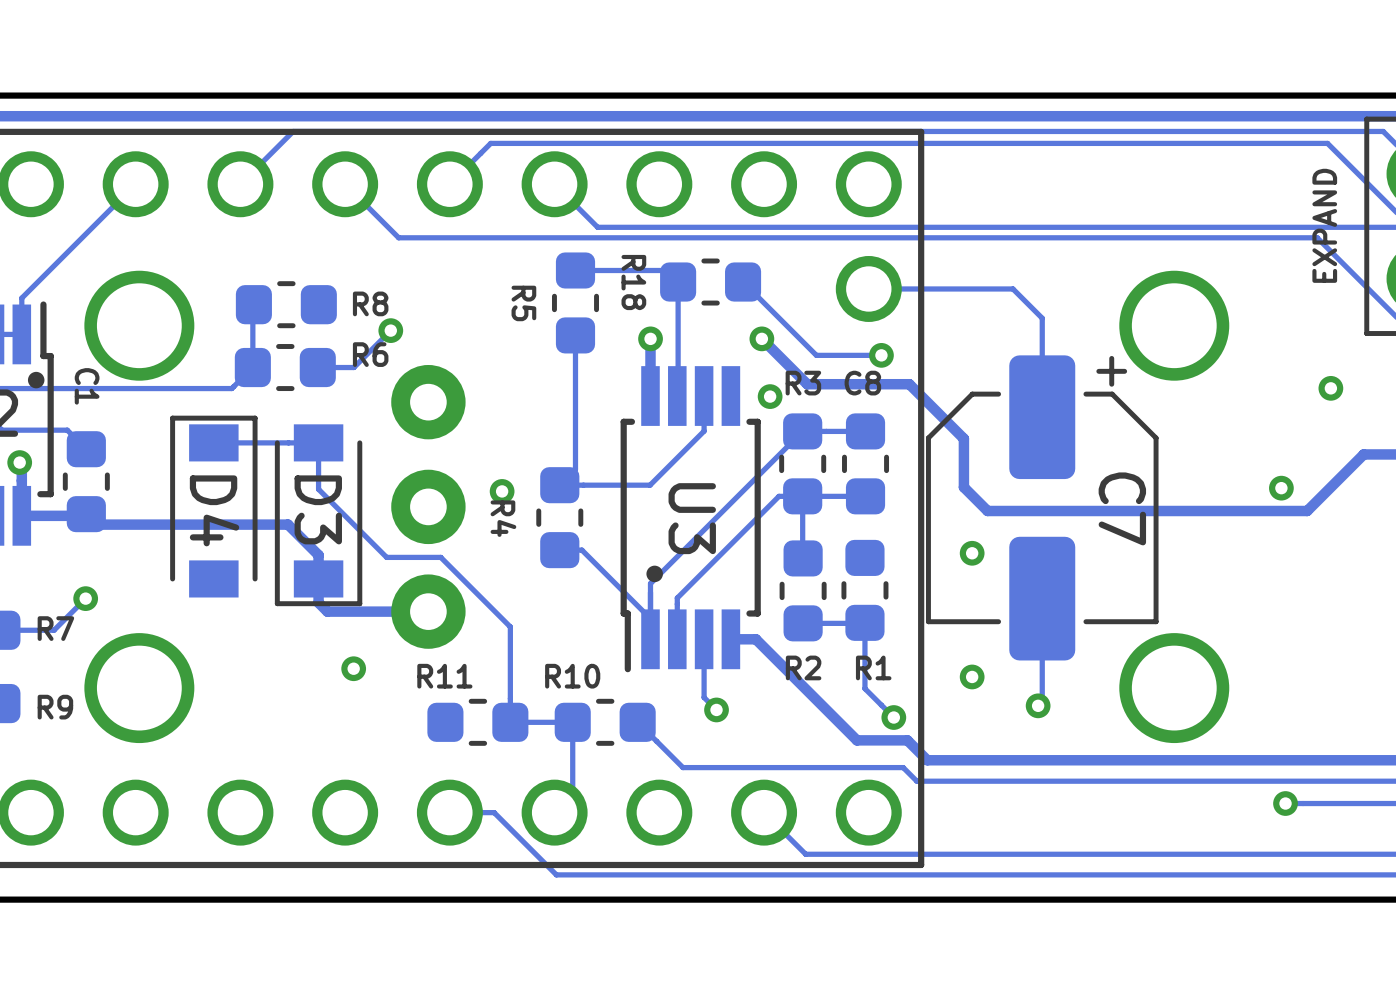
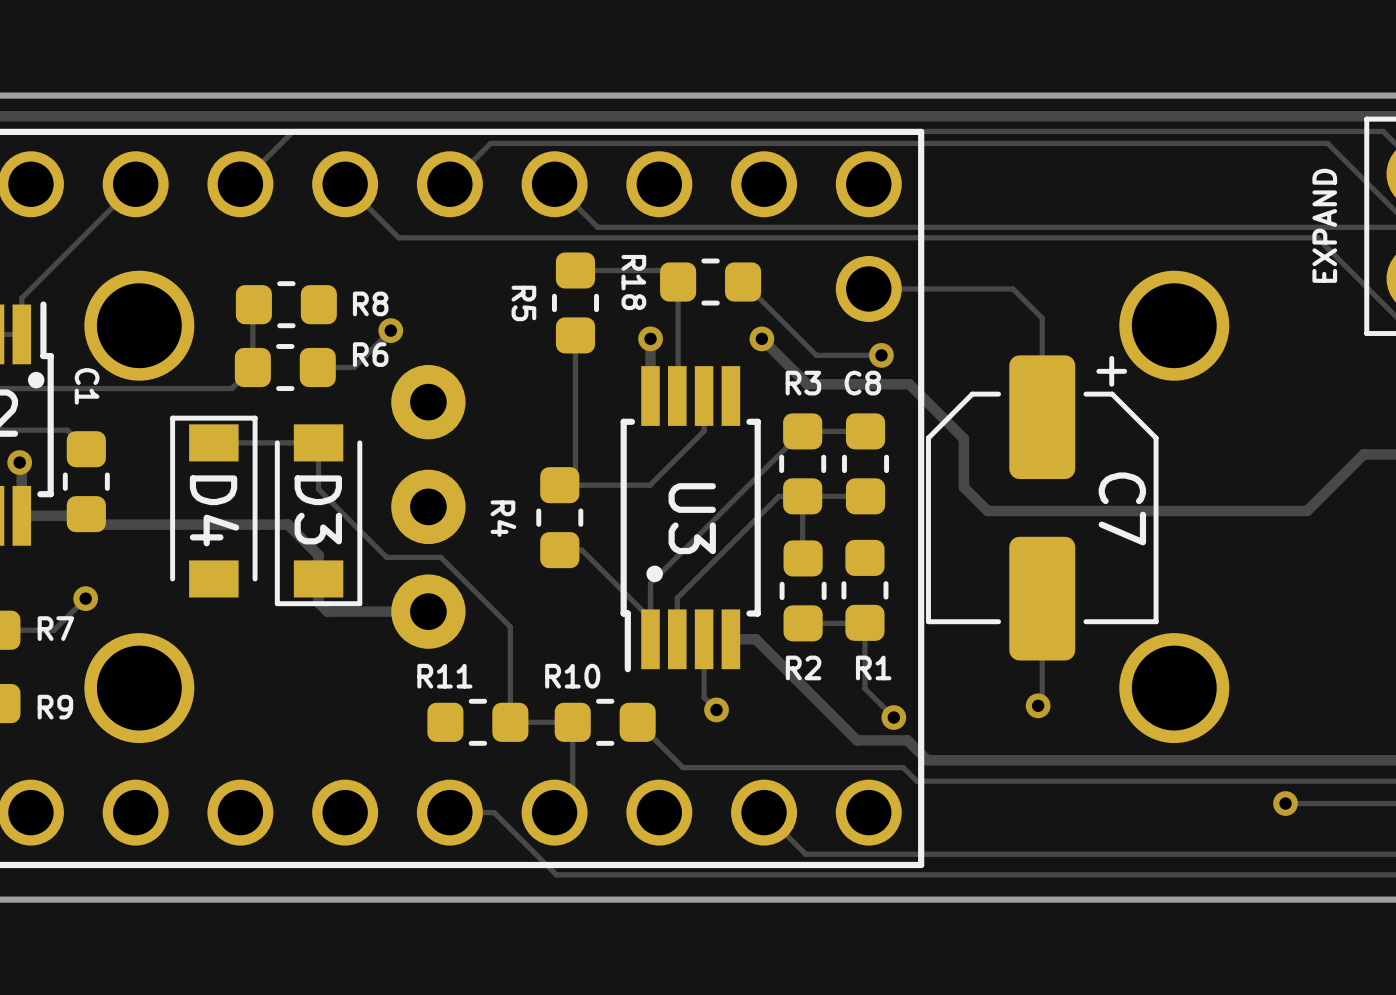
via: (1330, 388) -> none
via: (770, 396) -> none
via: (1281, 488) -> none
via: (502, 491) -> none
via: (972, 553) -> none
via: (353, 668) -> none
via: (972, 676) -> none

